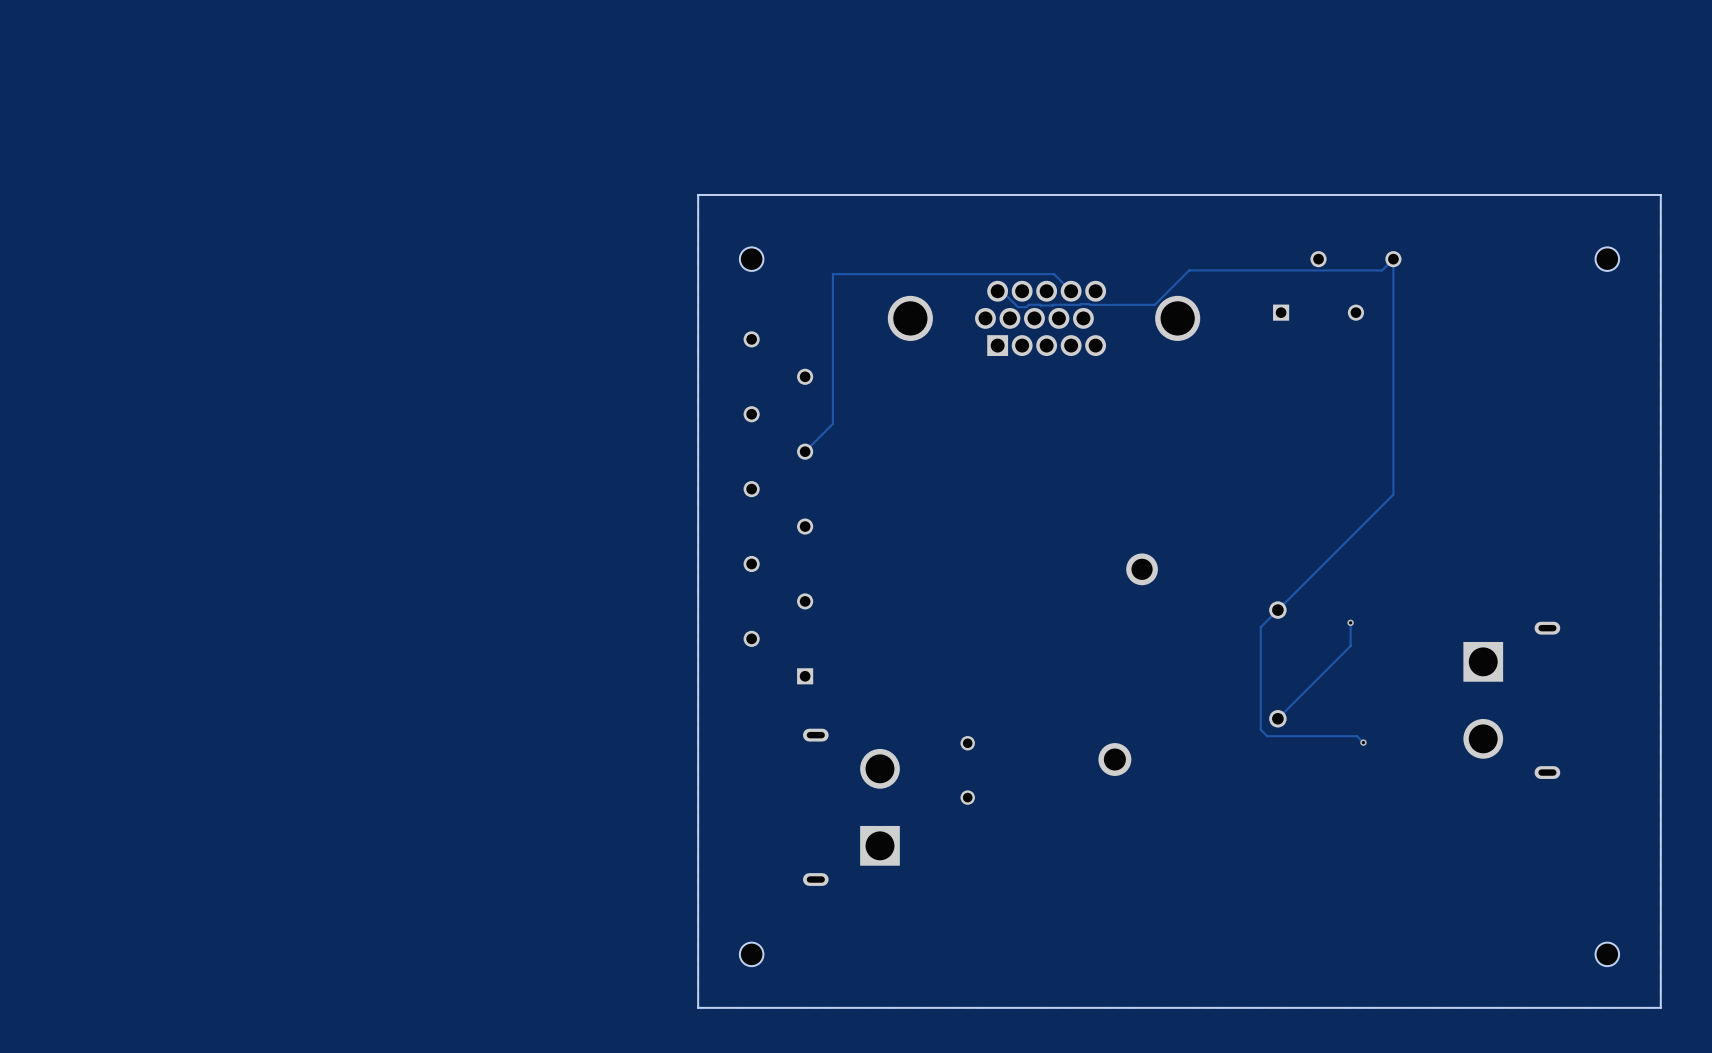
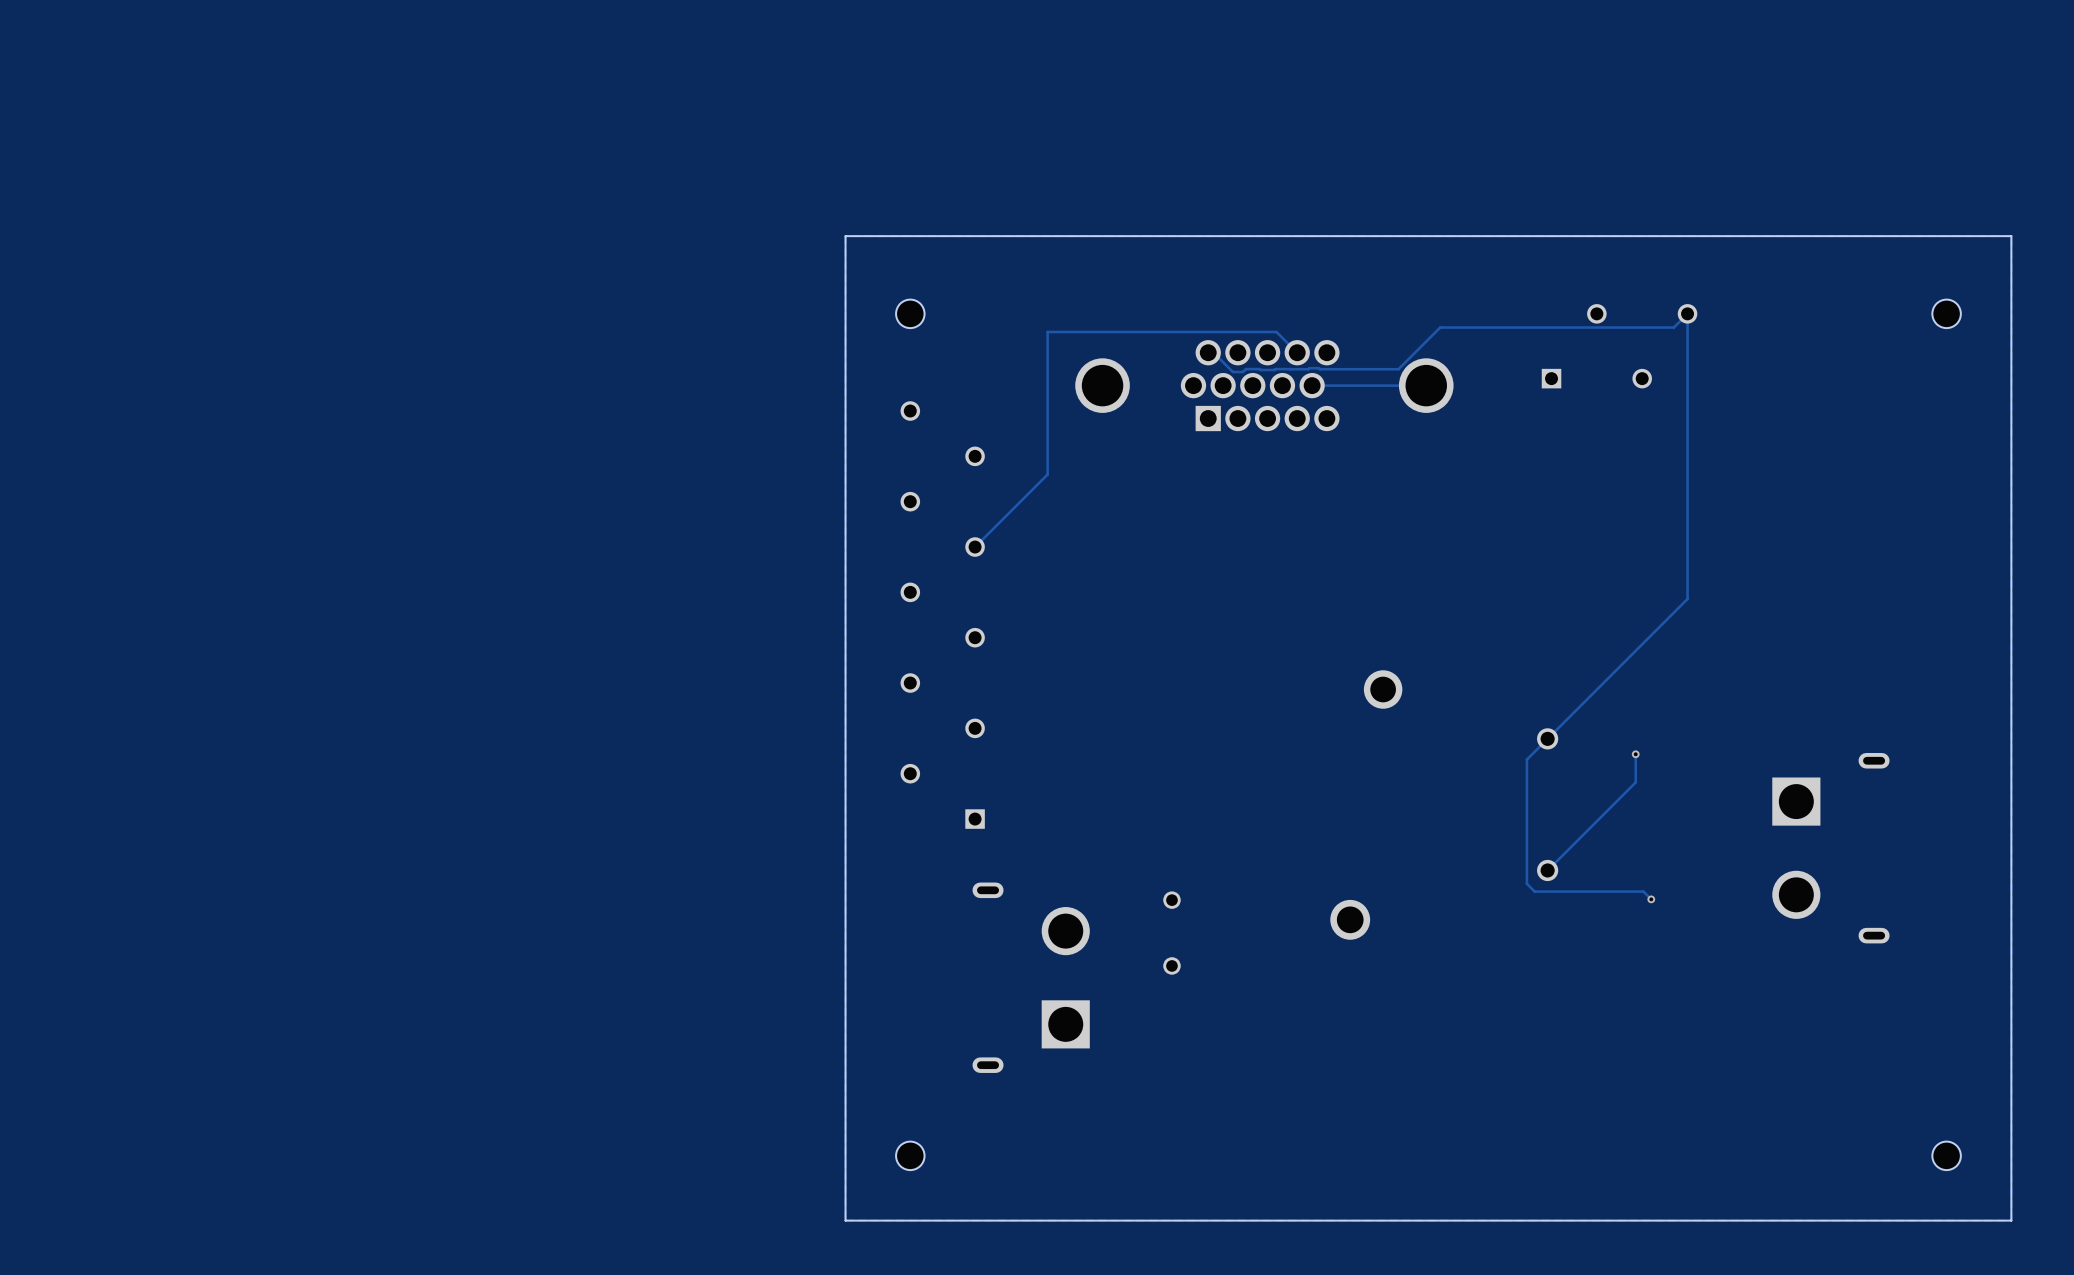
track: (865, 274) (832, 274) (832, 423) -> (1047, 331) (1047, 474) (1008, 513)
track: none -> (1426, 385) (1312, 385)

